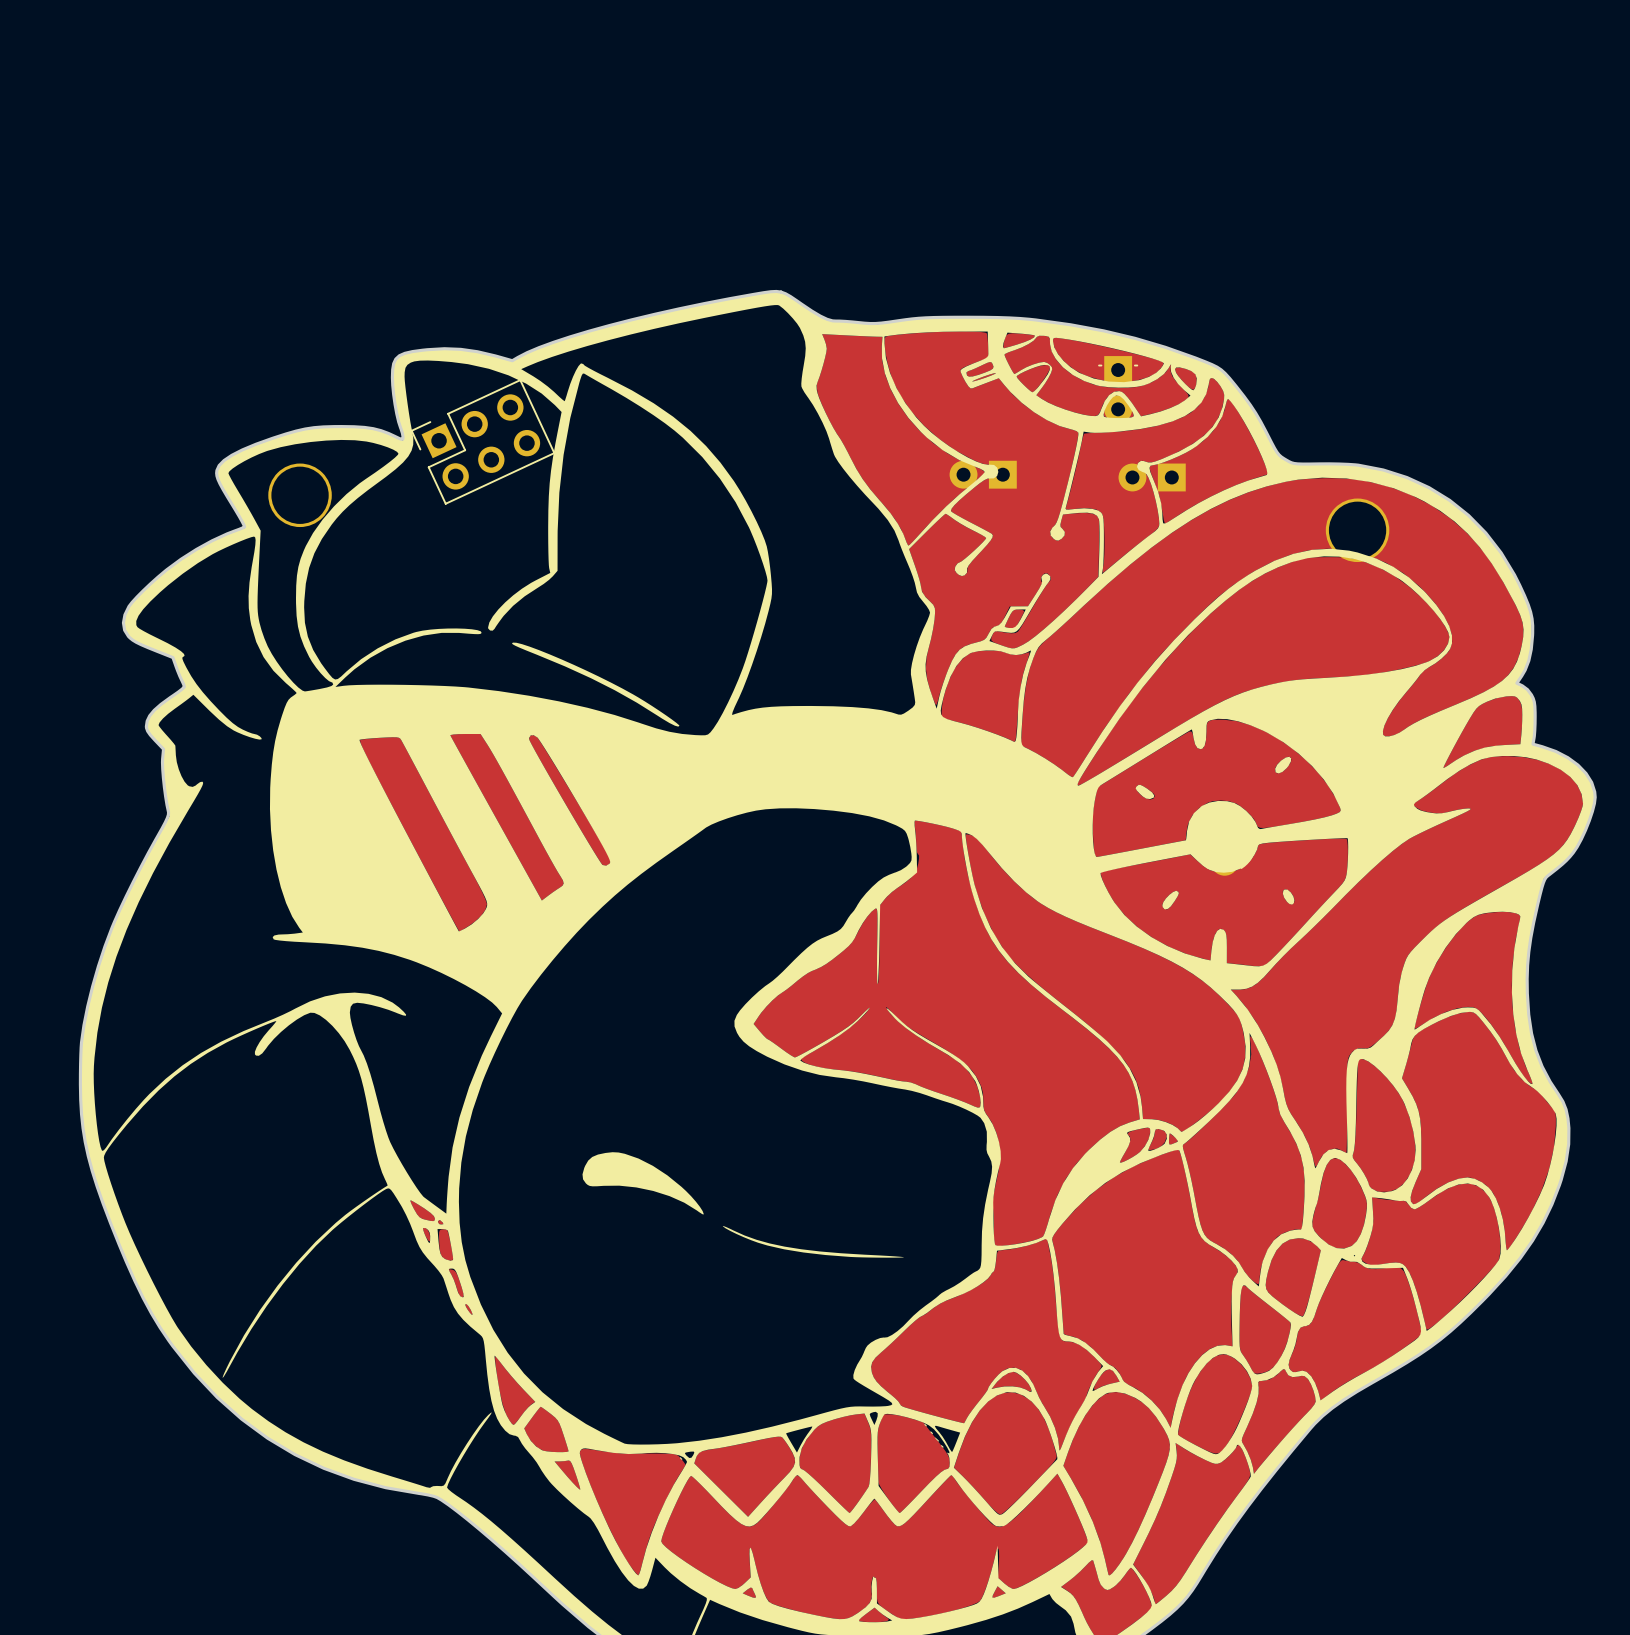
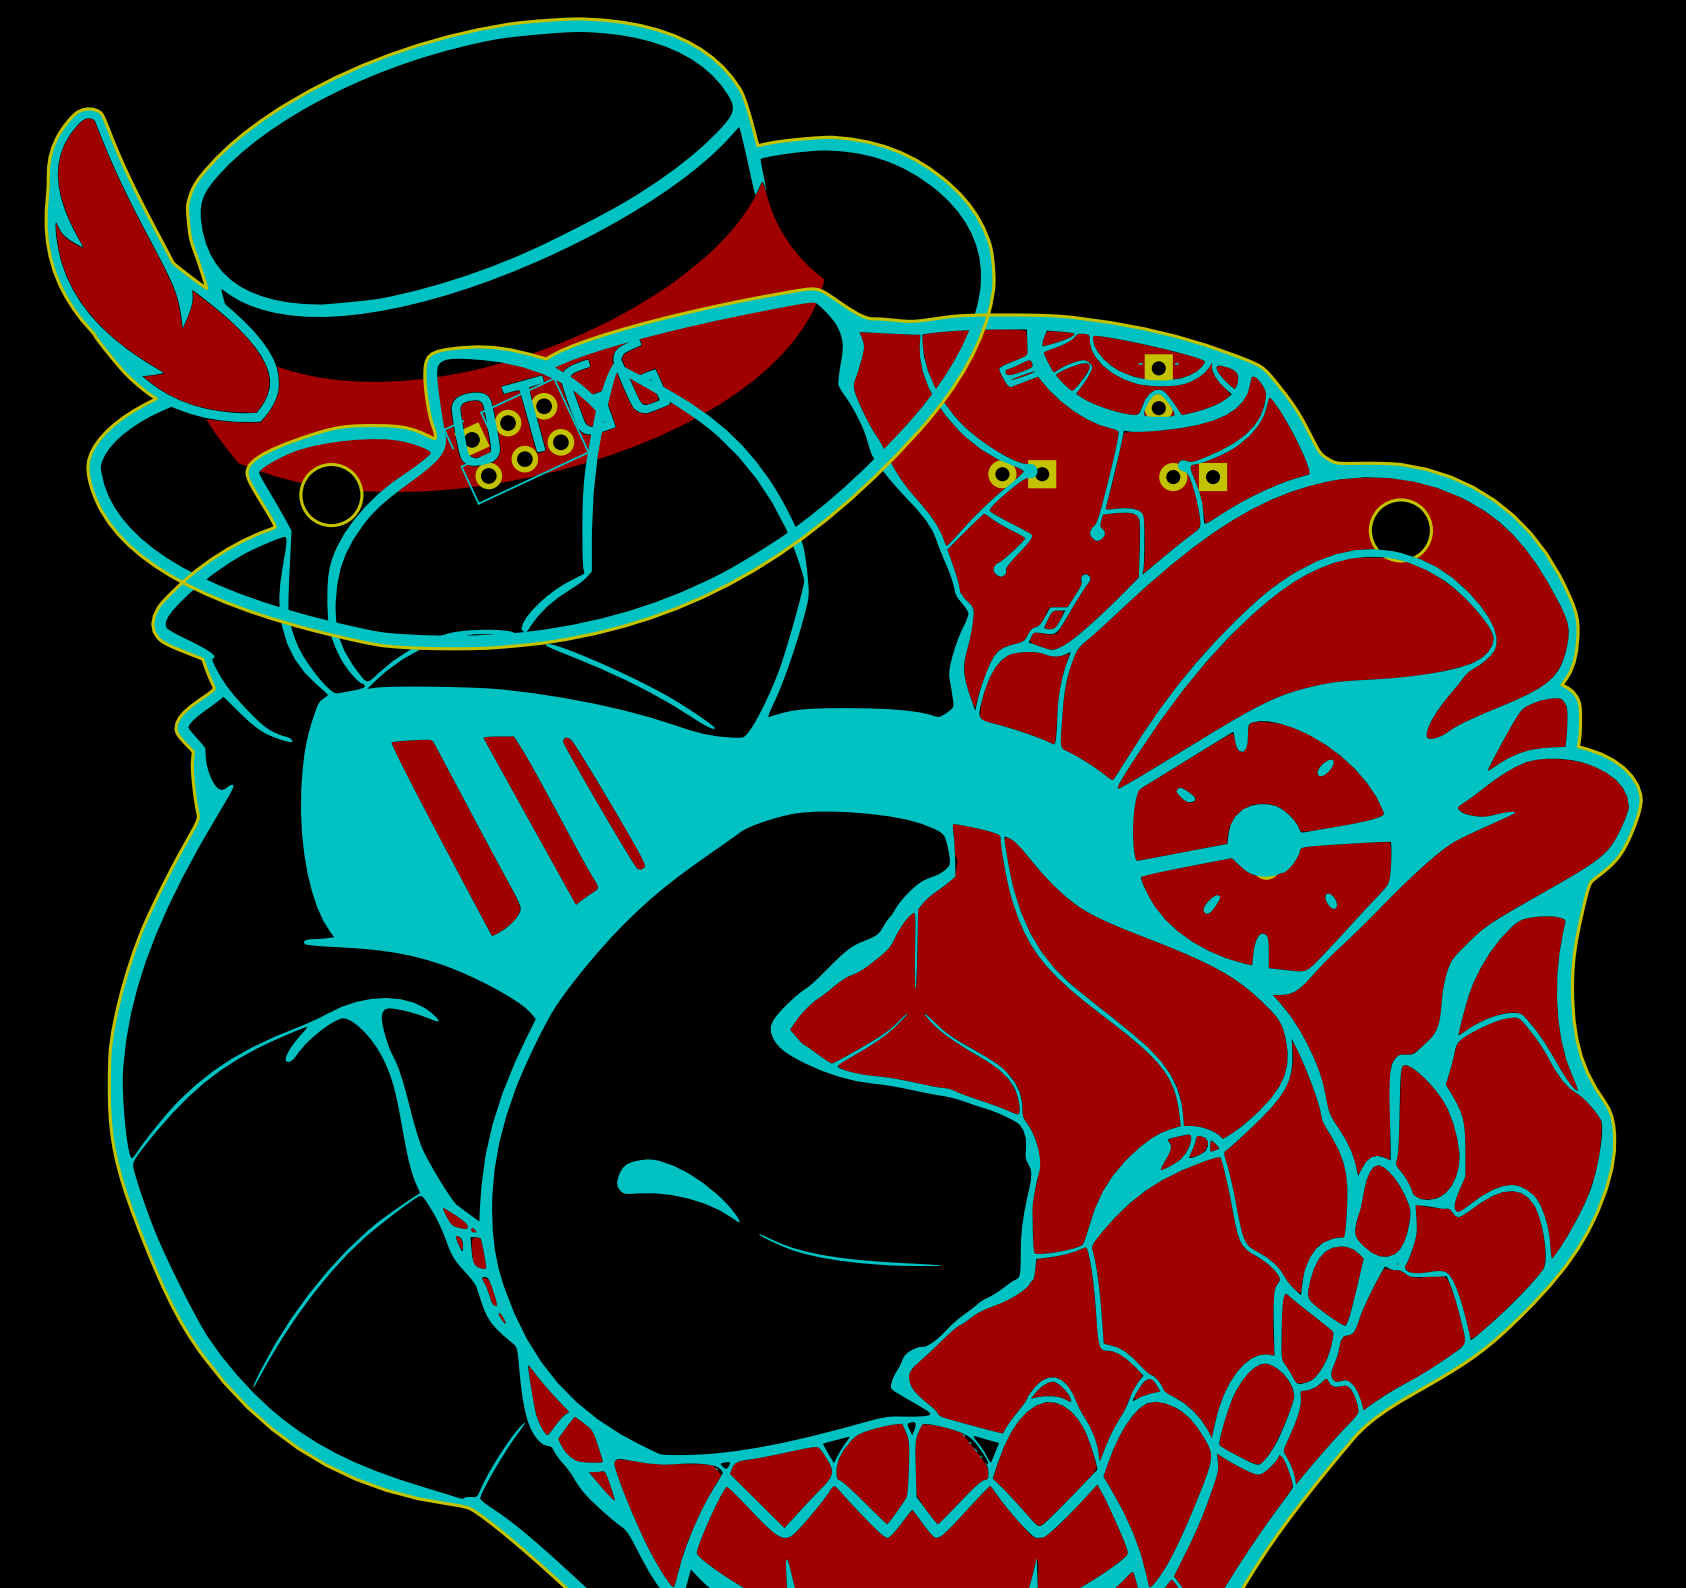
drawing: none -> [44, 17, 996, 651]

